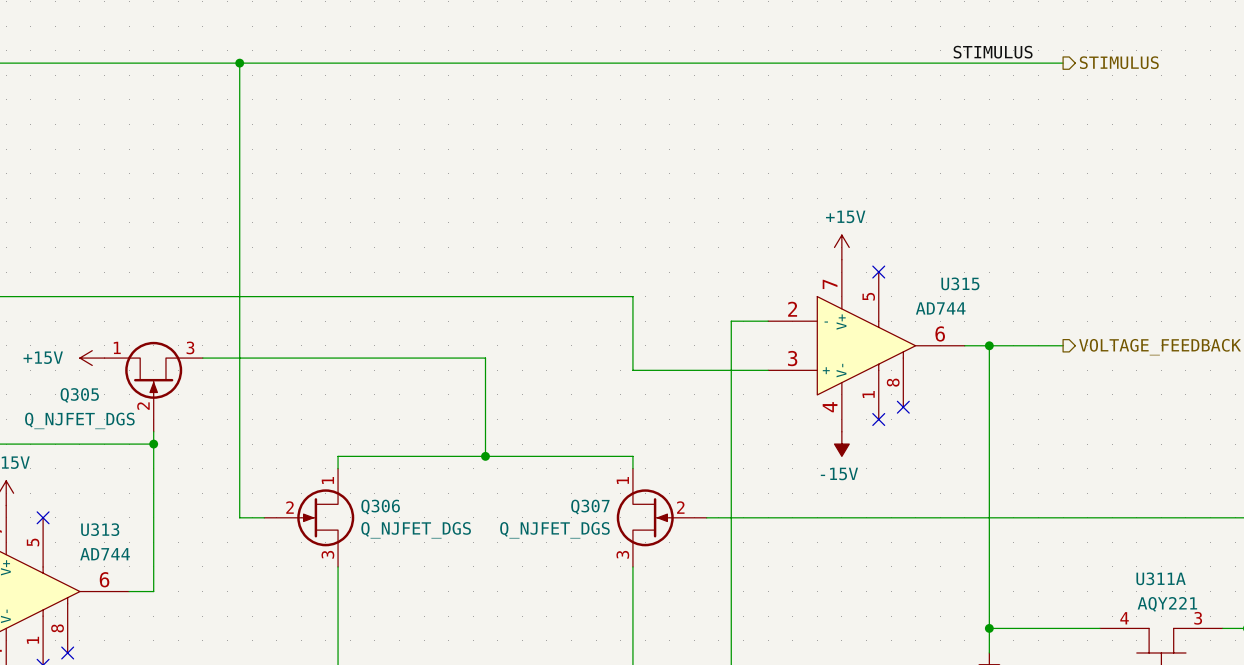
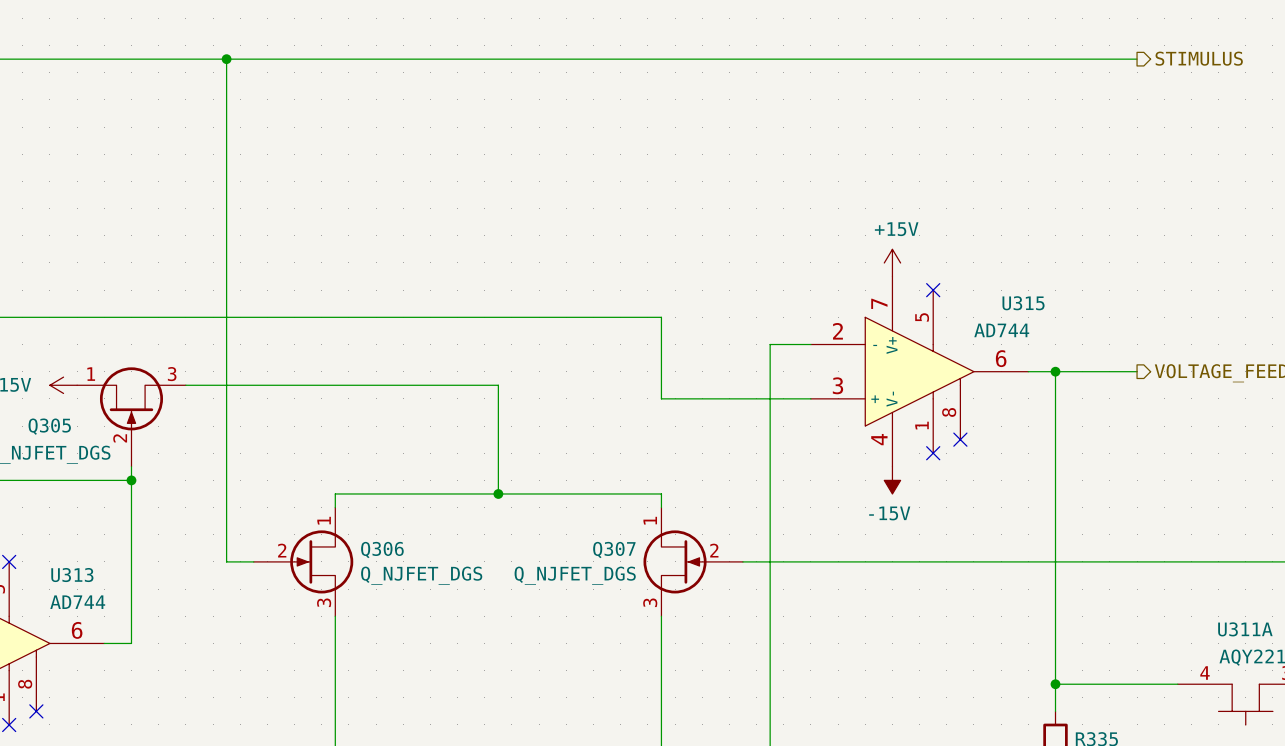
label: STIMULUS (993, 52) -> none

